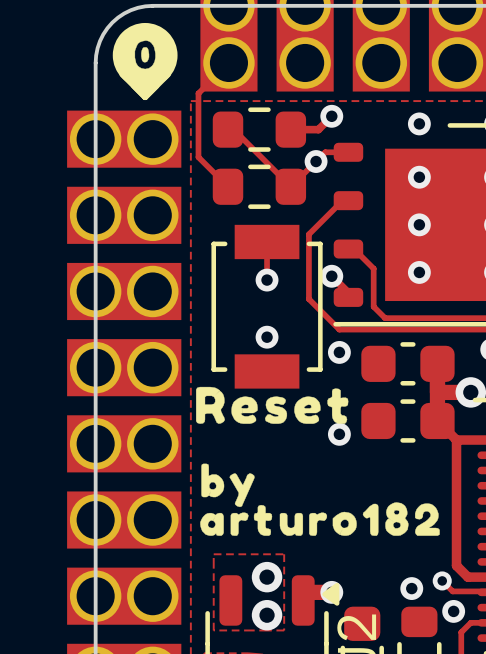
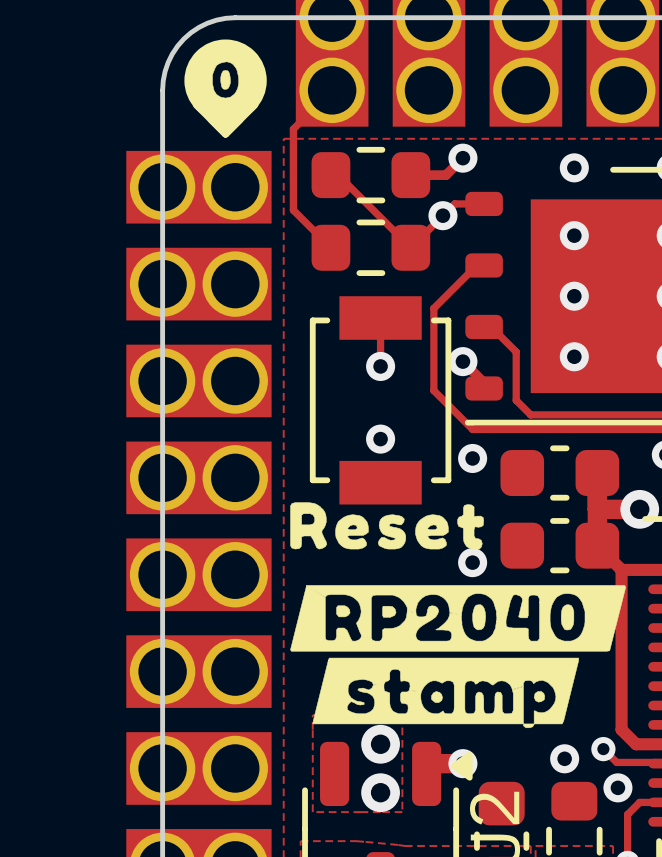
drawing: none -> [290, 585, 626, 729]
drawing: [200, 463, 440, 536] -> none

